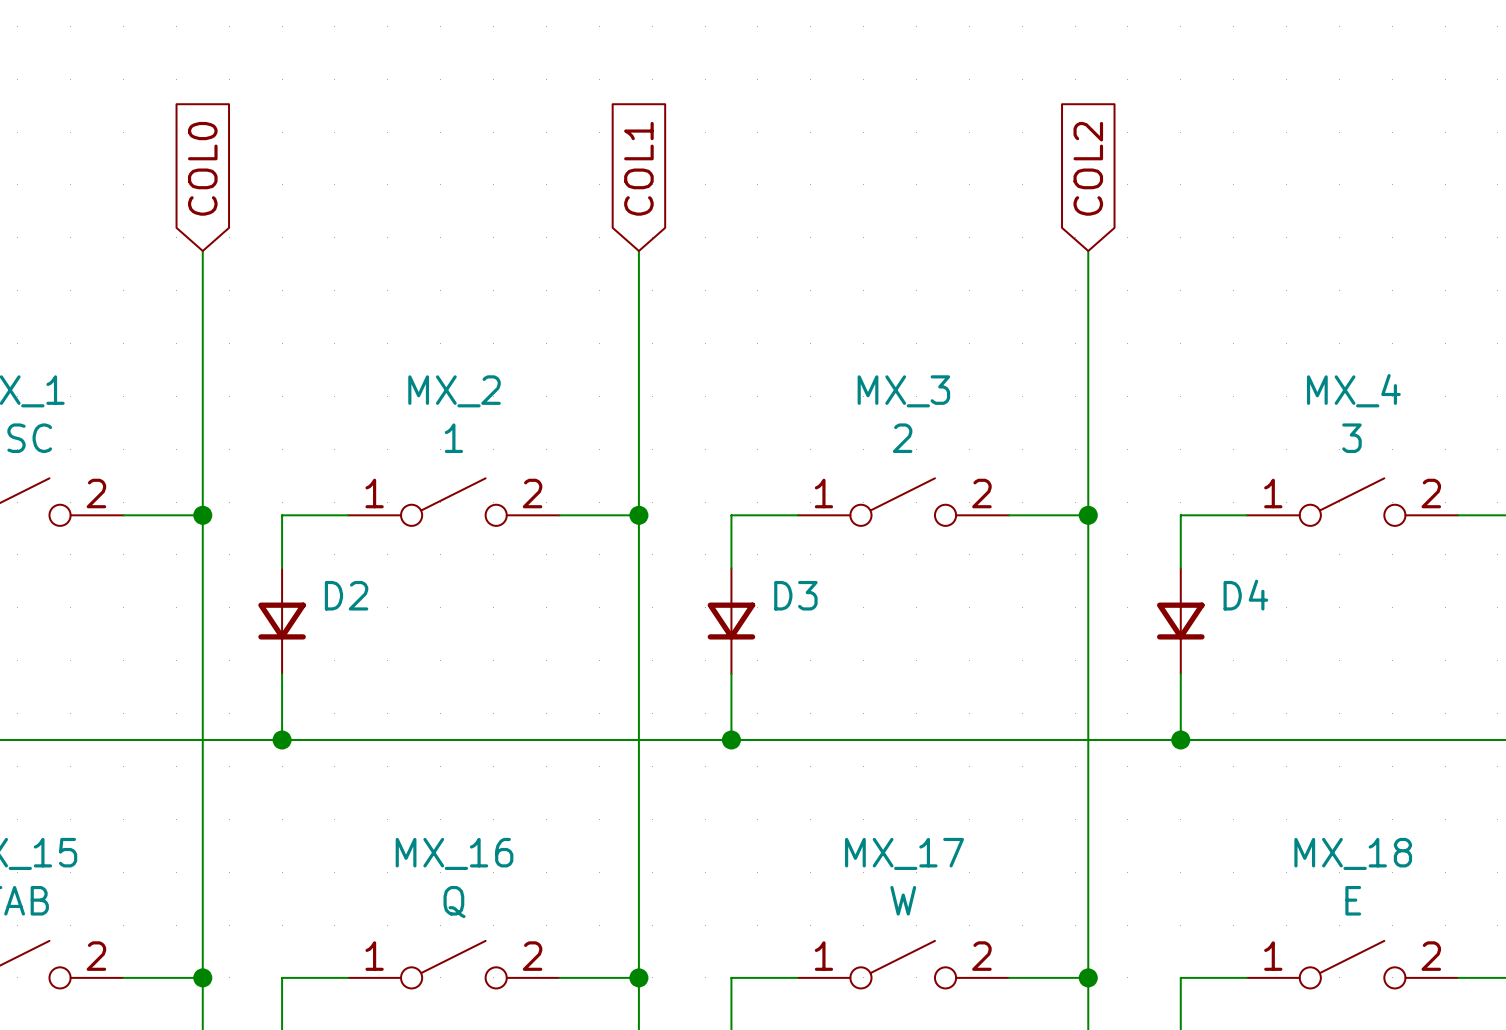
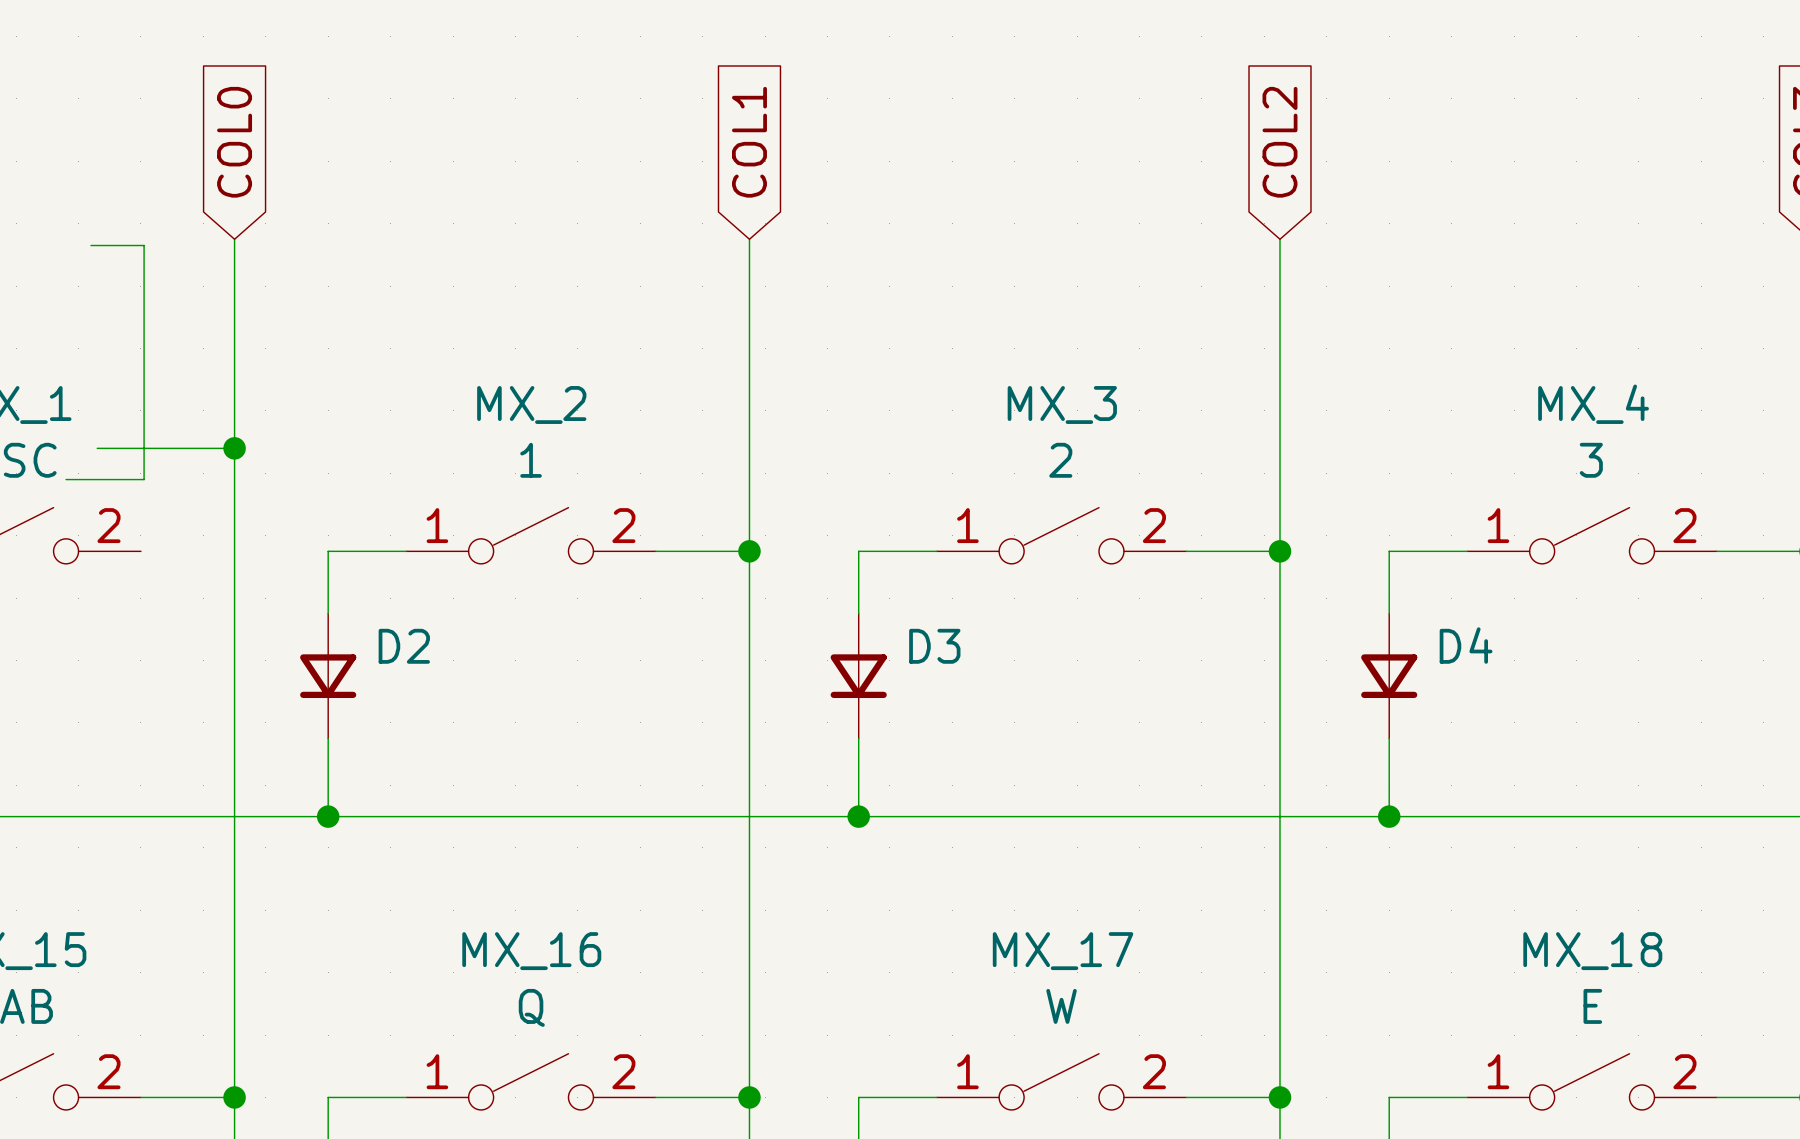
wire: none -> (91, 245) (144, 245) (144, 479) (66, 479)
wire: none -> (97, 448) (234, 448)
wire: (123, 515) (202, 515) -> none
junction position: (202, 515) -> (234, 448)

